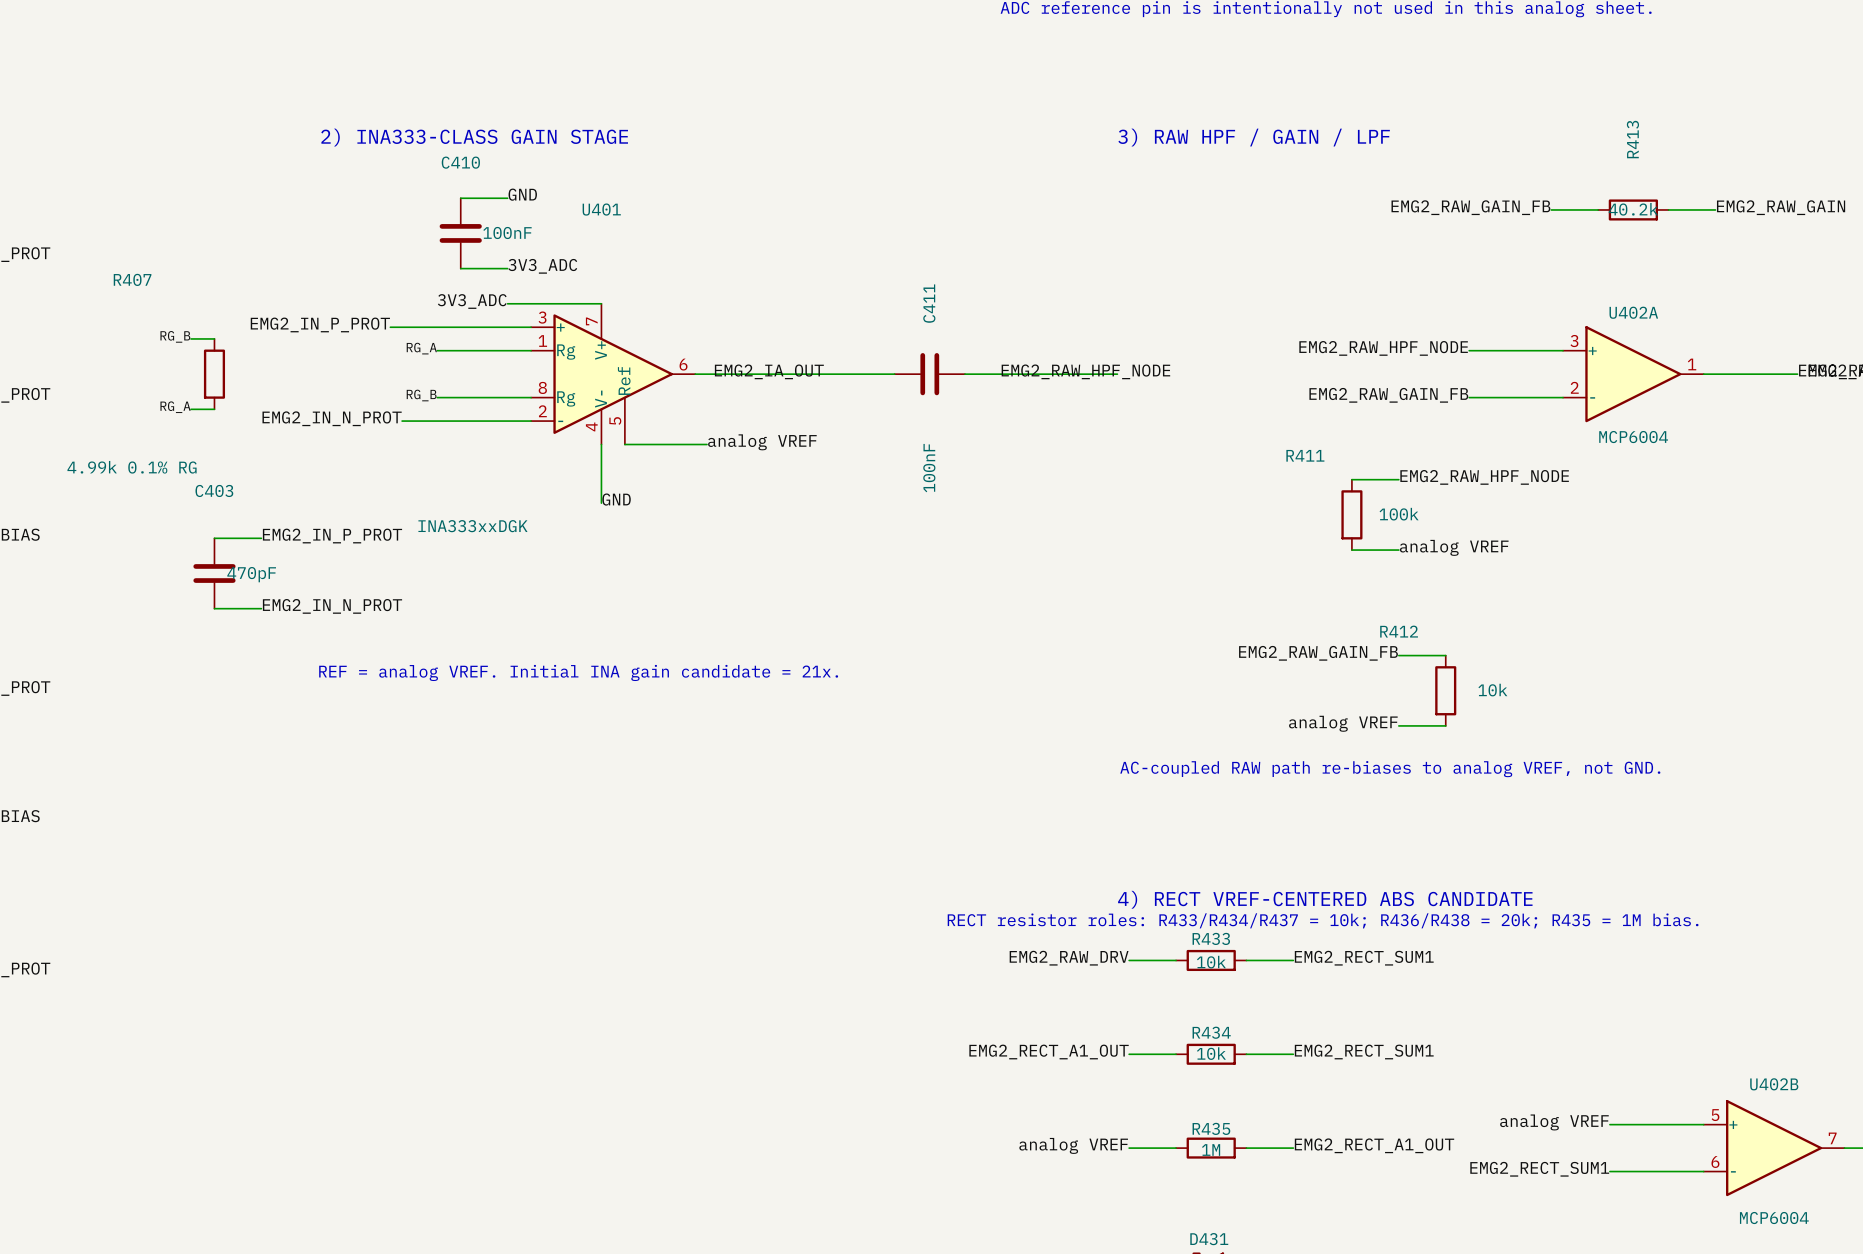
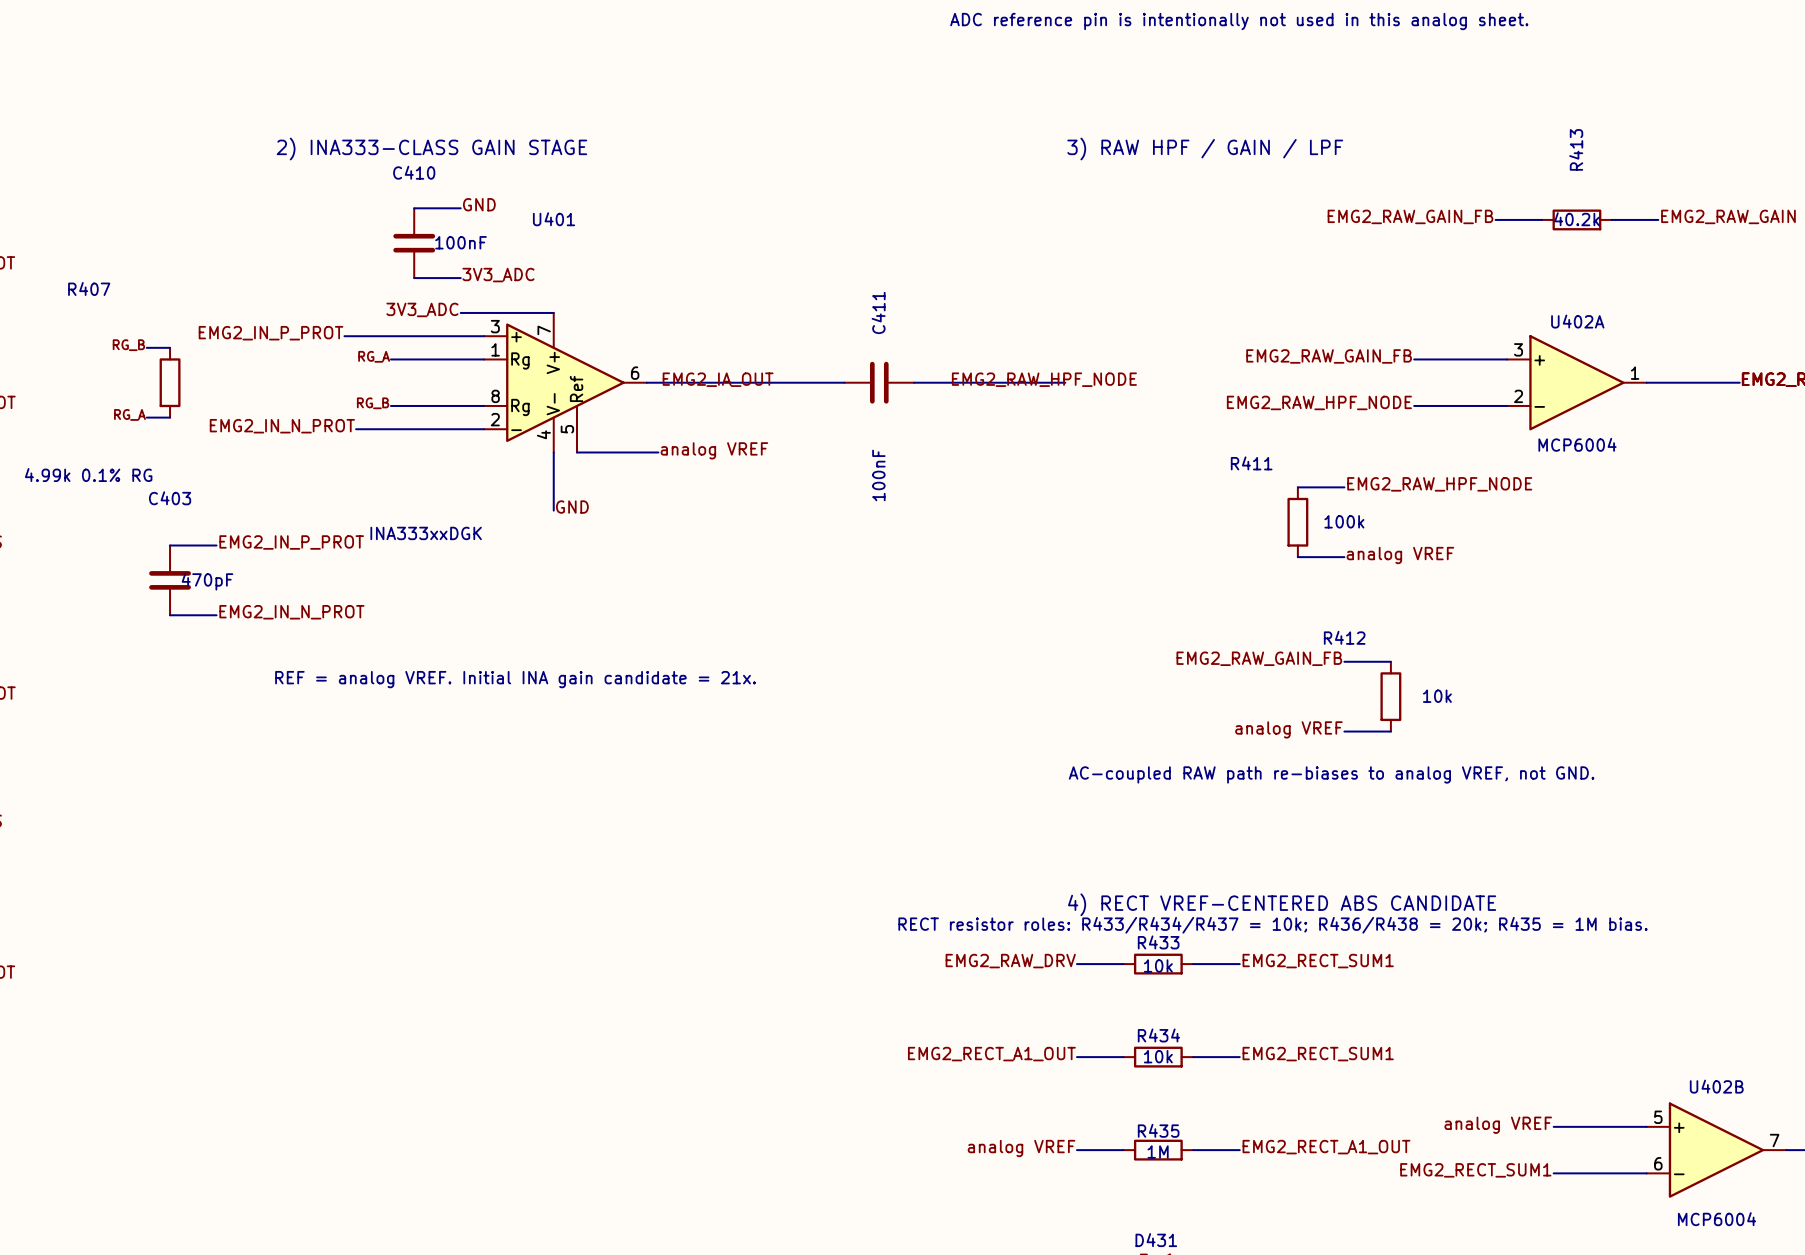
label: EMG2_RAW_HPF_NODE (1383, 348) -> EMG2_RAW_GAIN_FB (1329, 356)
label: EMG2_RAW_GAIN_FB (1388, 395) -> EMG2_RAW_HPF_NODE (1319, 402)

